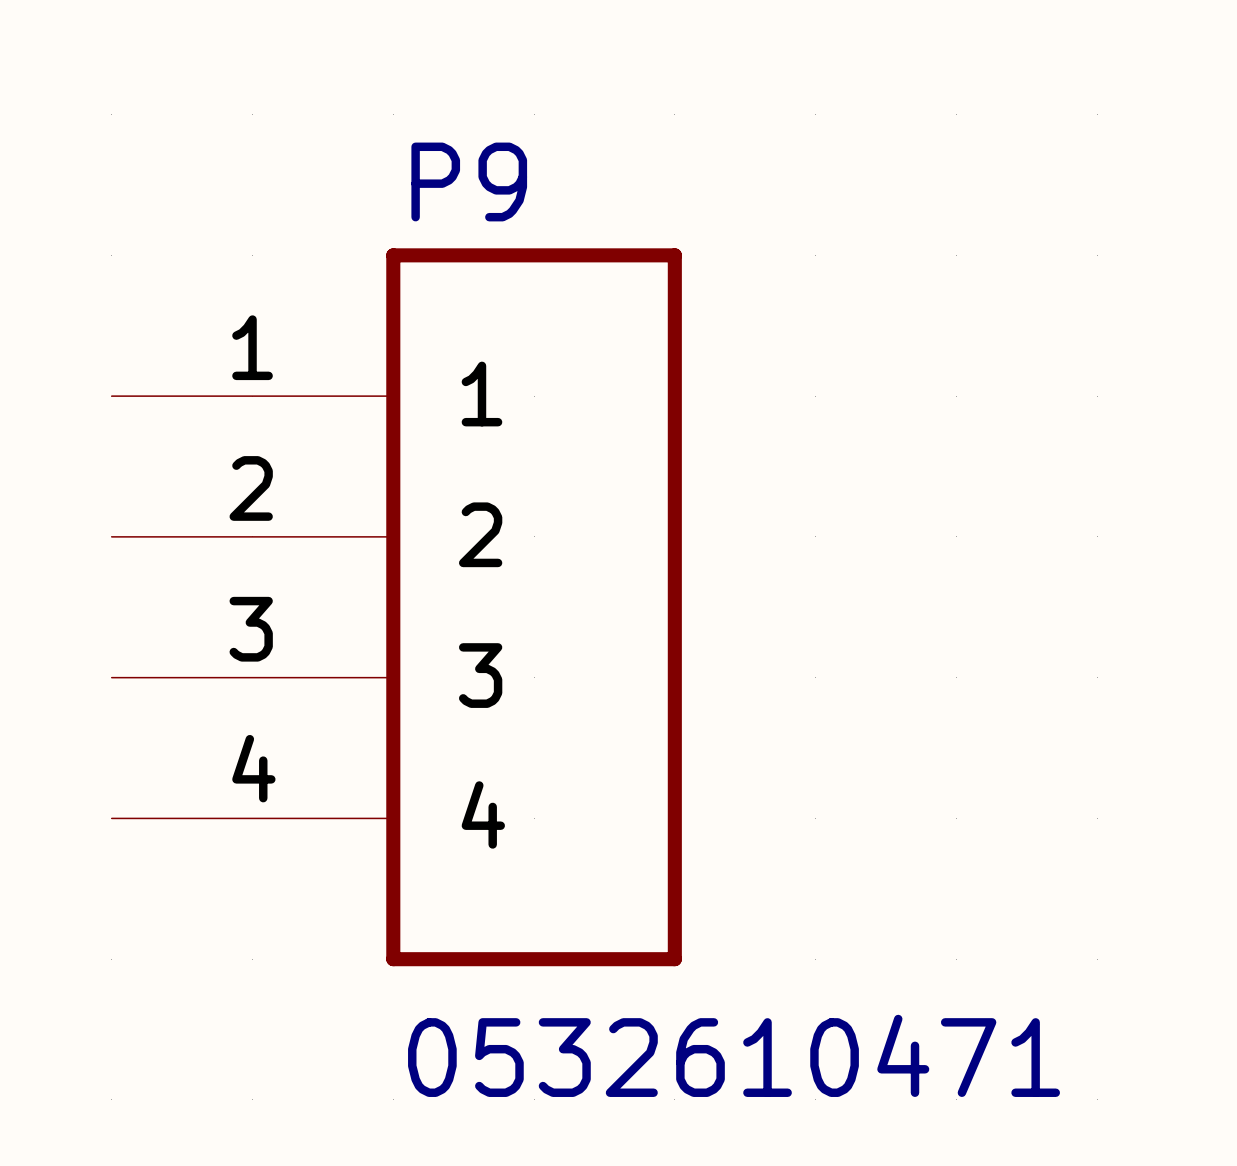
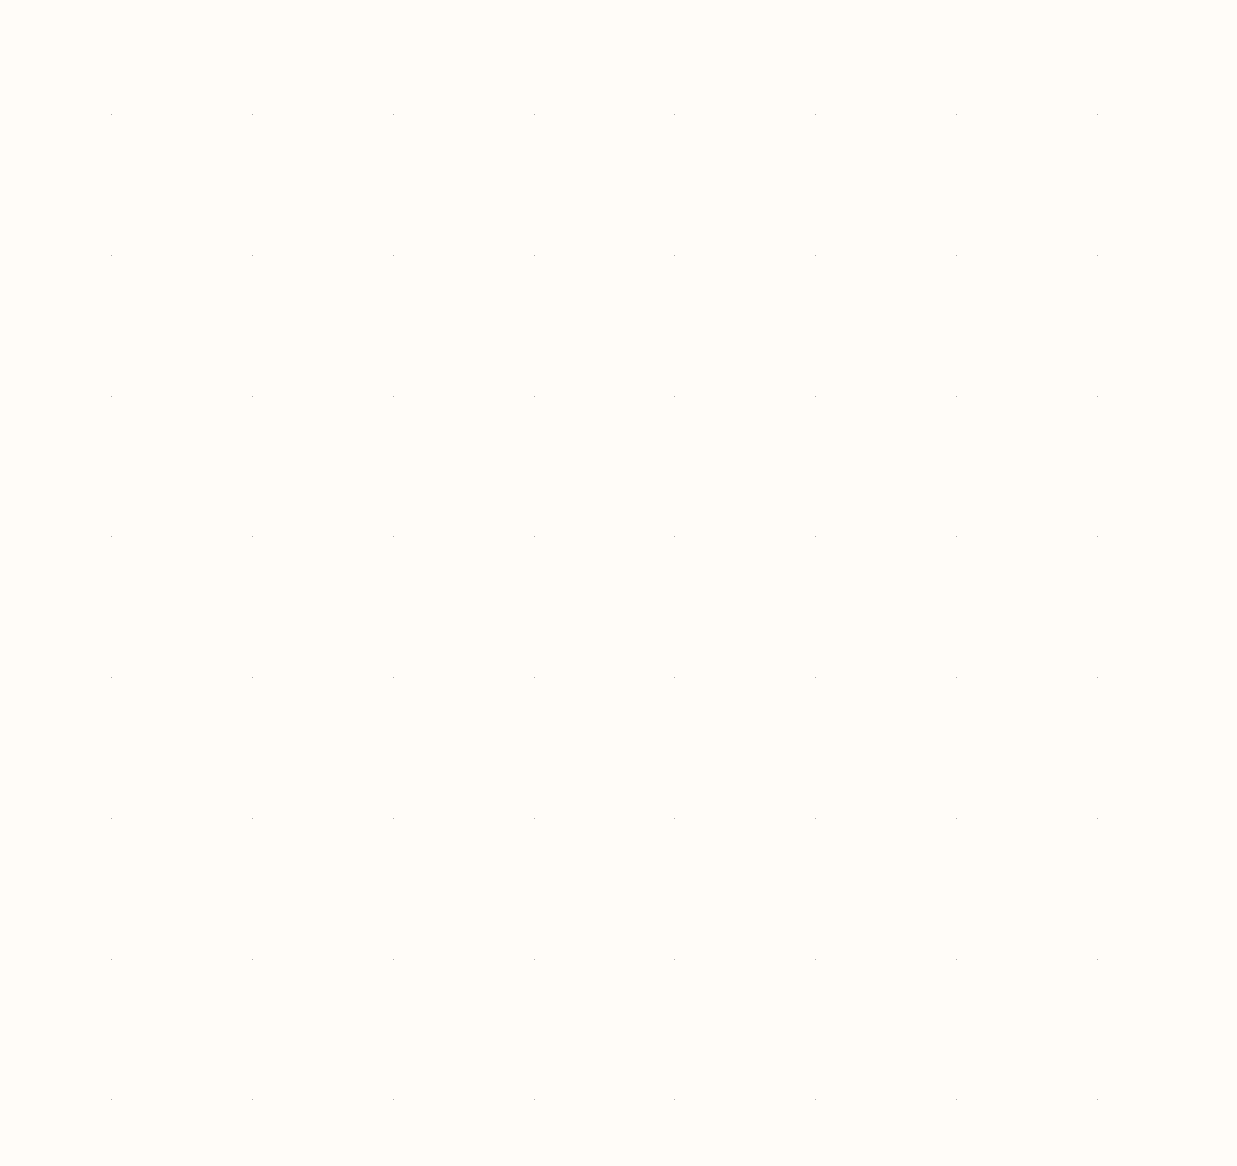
P9: 0532610471 (396, 607) -> none

